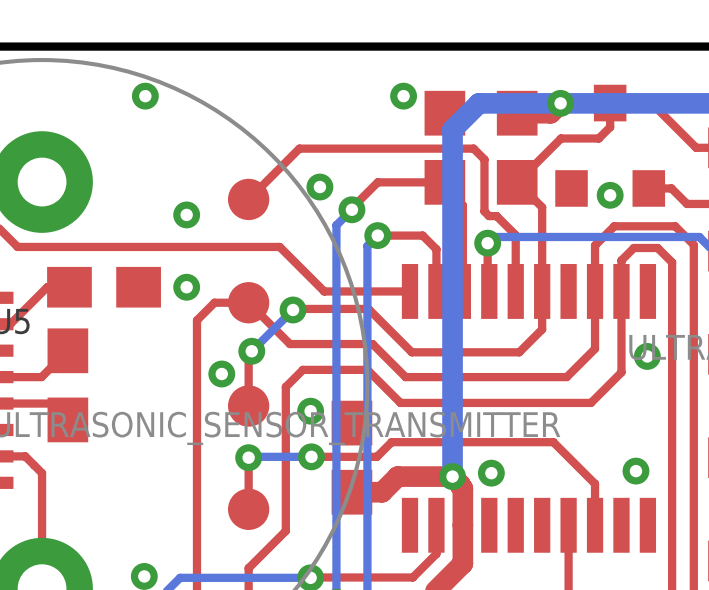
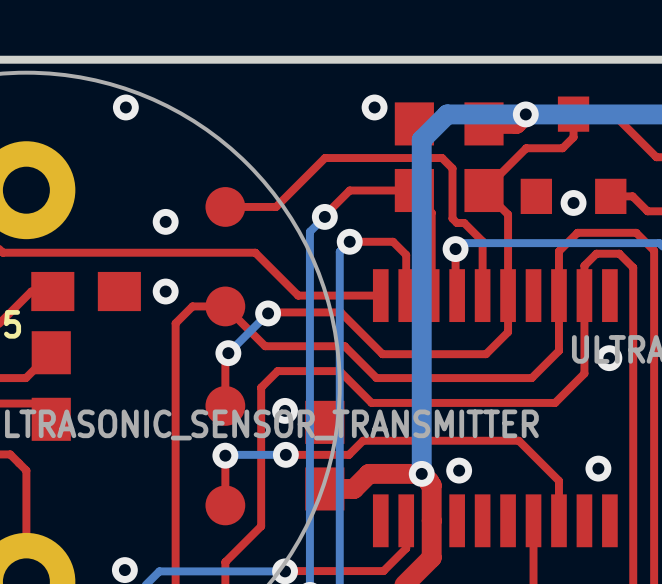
top track: (352, 148) (299, 148) (248, 199) -> (325, 158) (276, 206) (225, 206)
via: (319, 187) -> none
via: (221, 374) -> none

